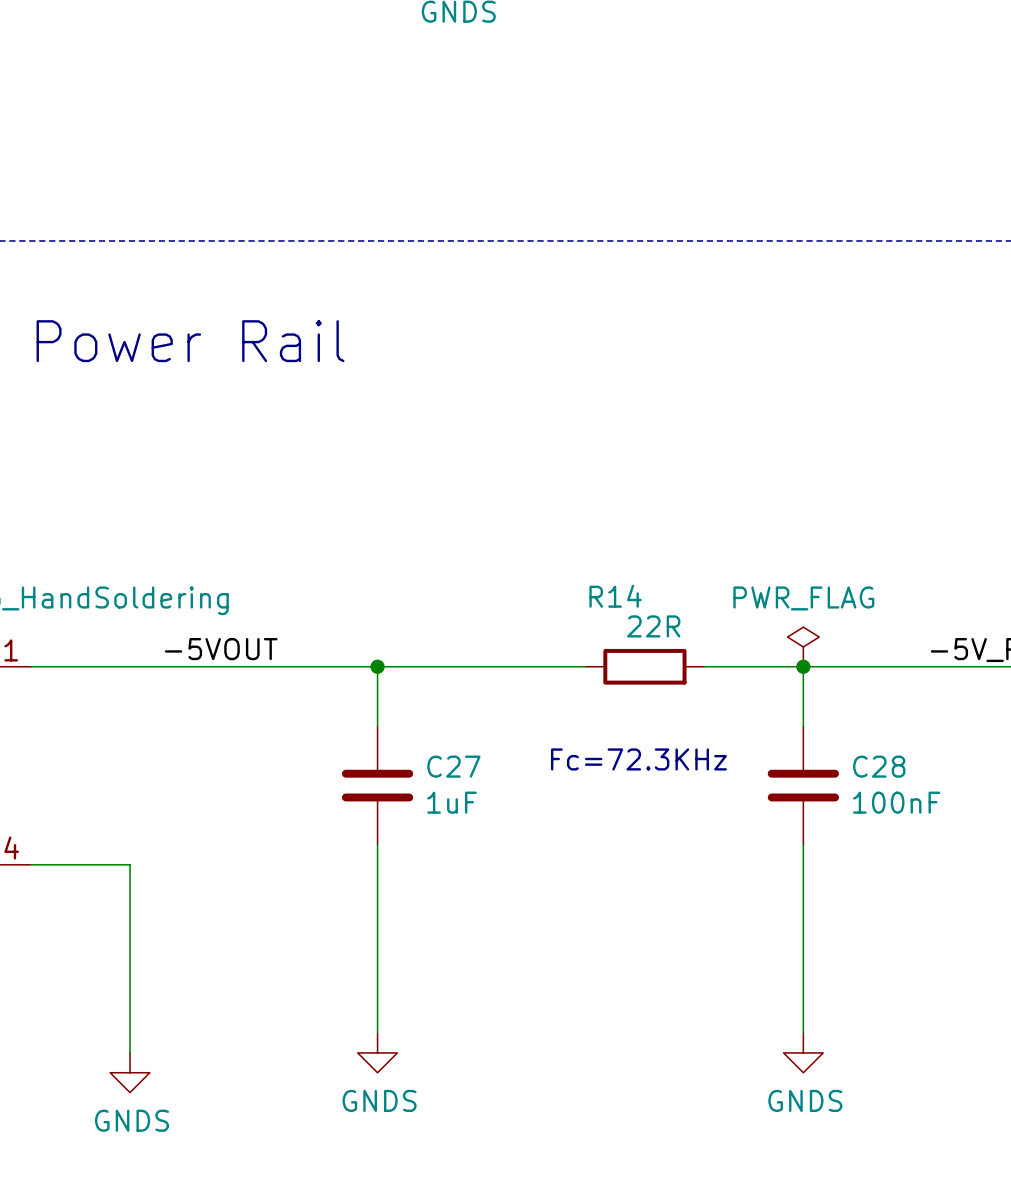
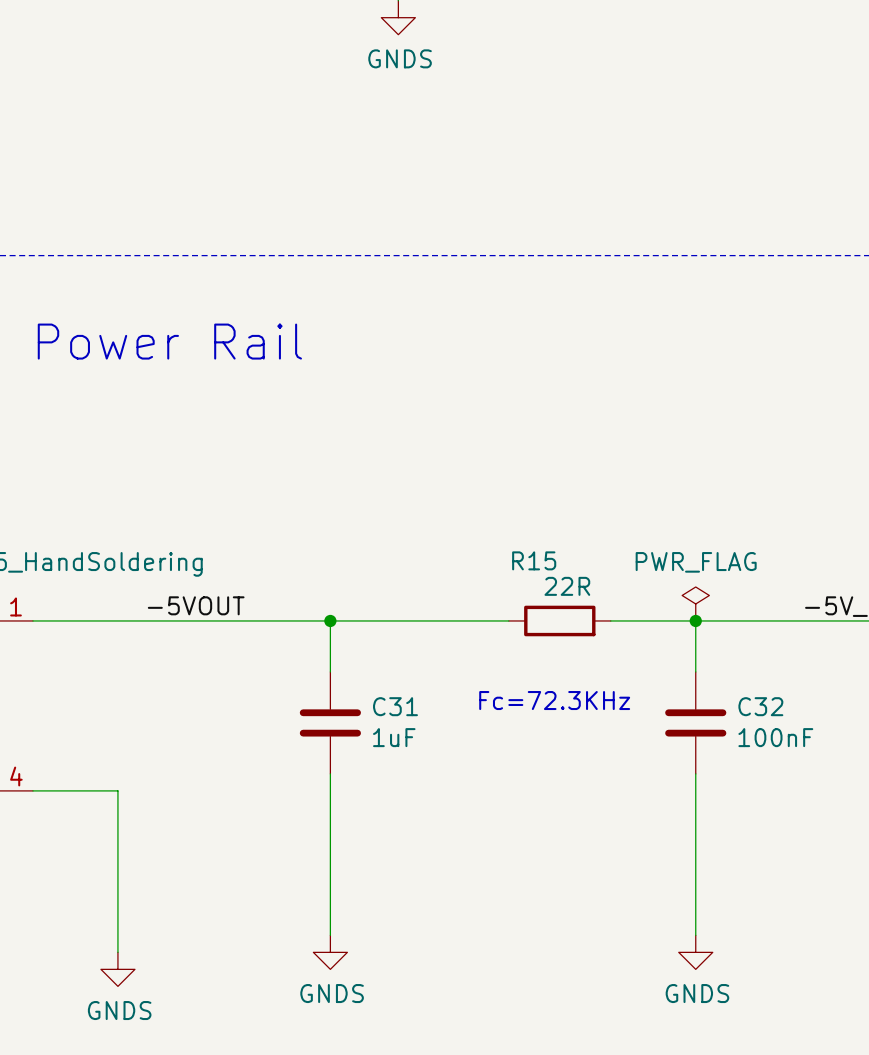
R14 name: R14 (615, 596) -> R15 (534, 560)
C27 name: C27 (453, 766) -> C31 (395, 706)
C28 name: C28 (879, 766) -> C32 (760, 706)

